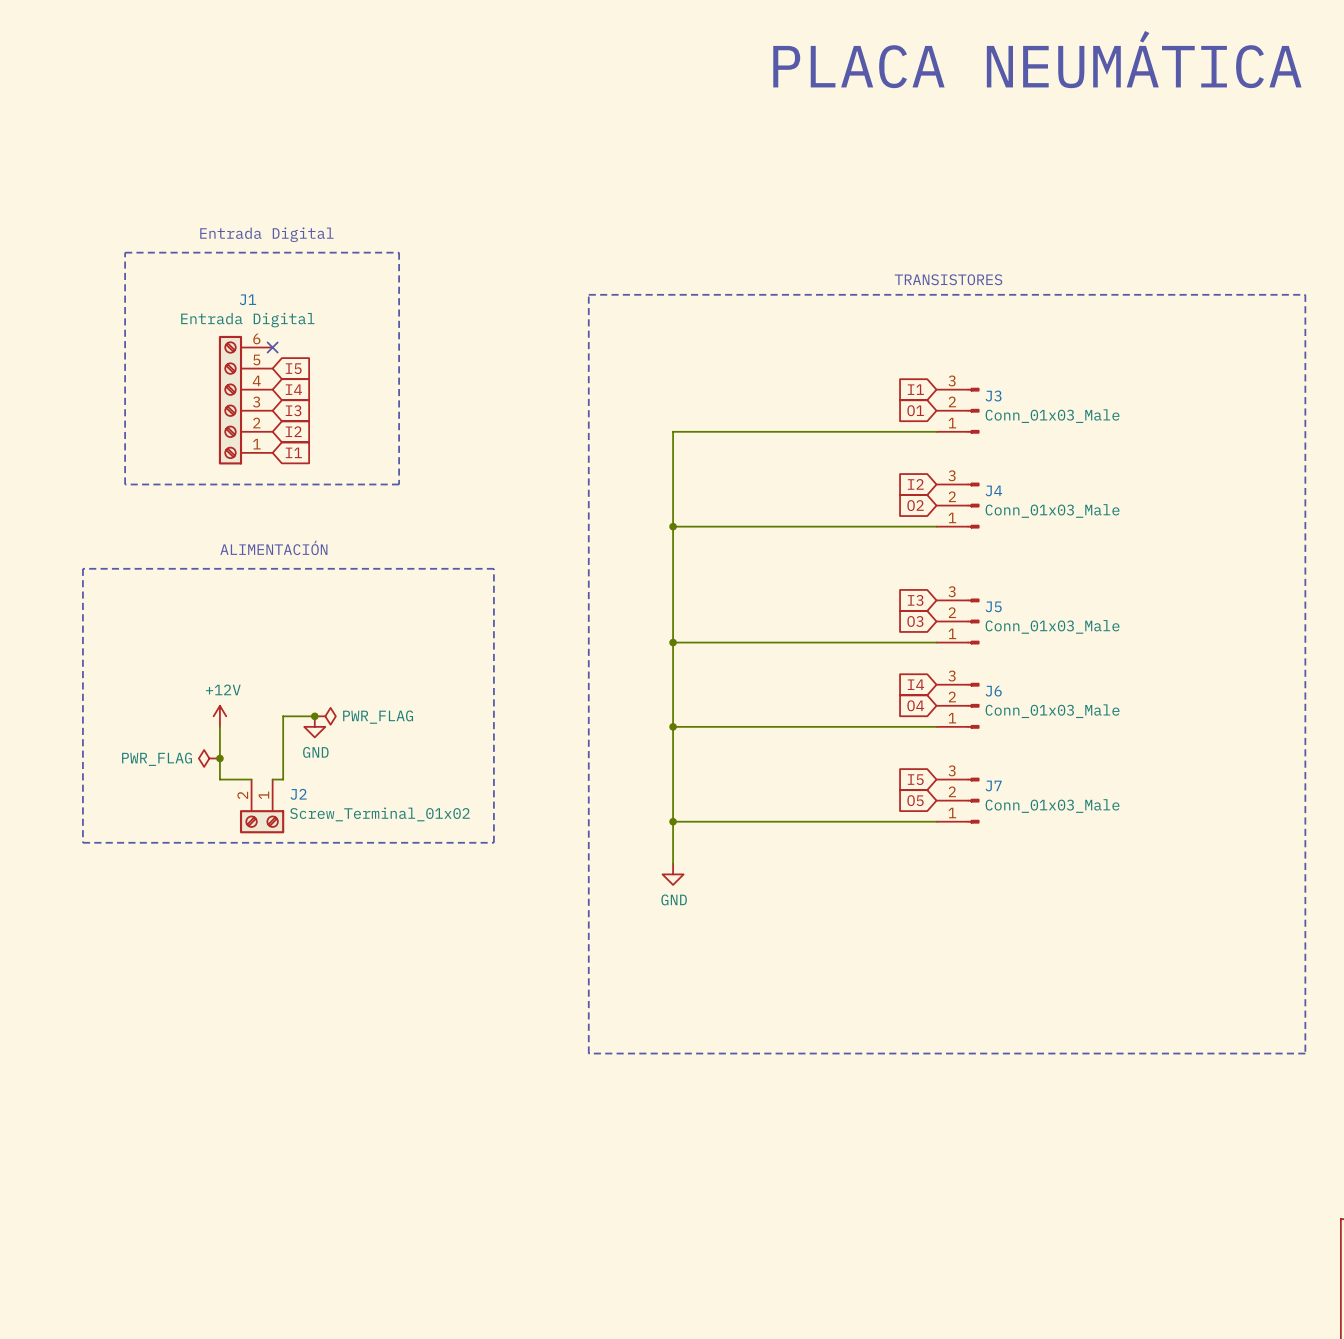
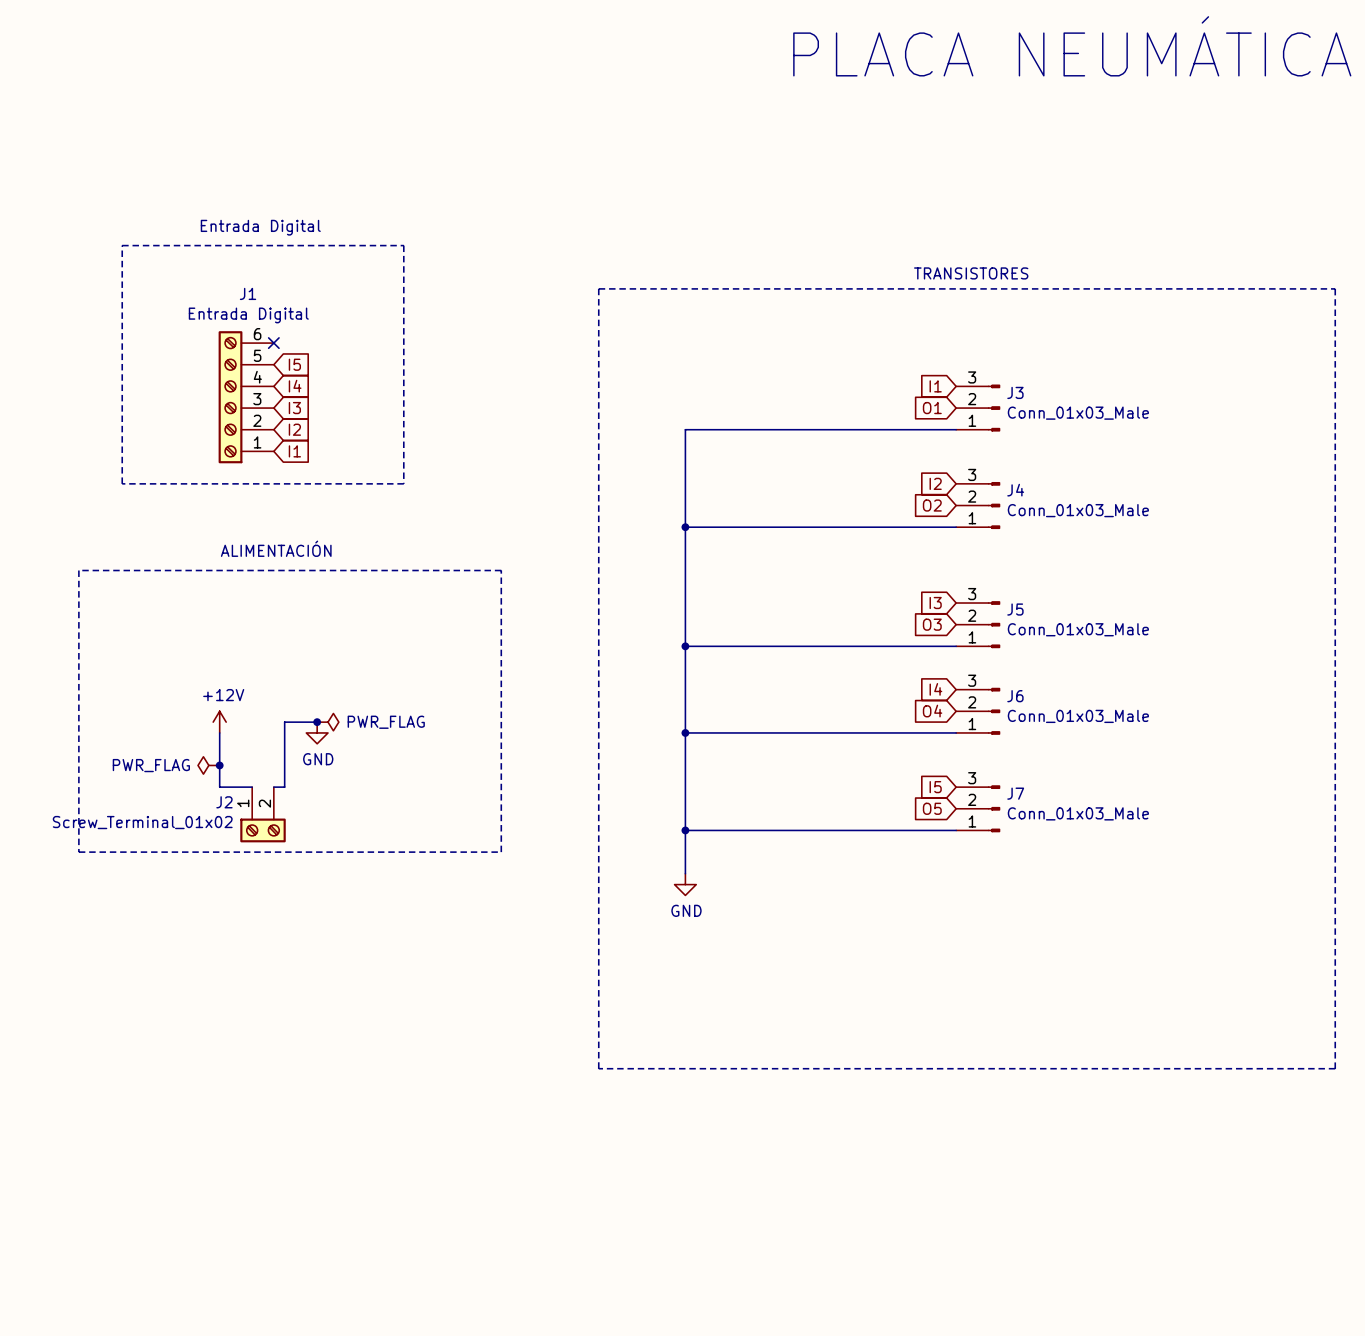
J2 flip: as is (262, 821) -> left-right (263, 830)

